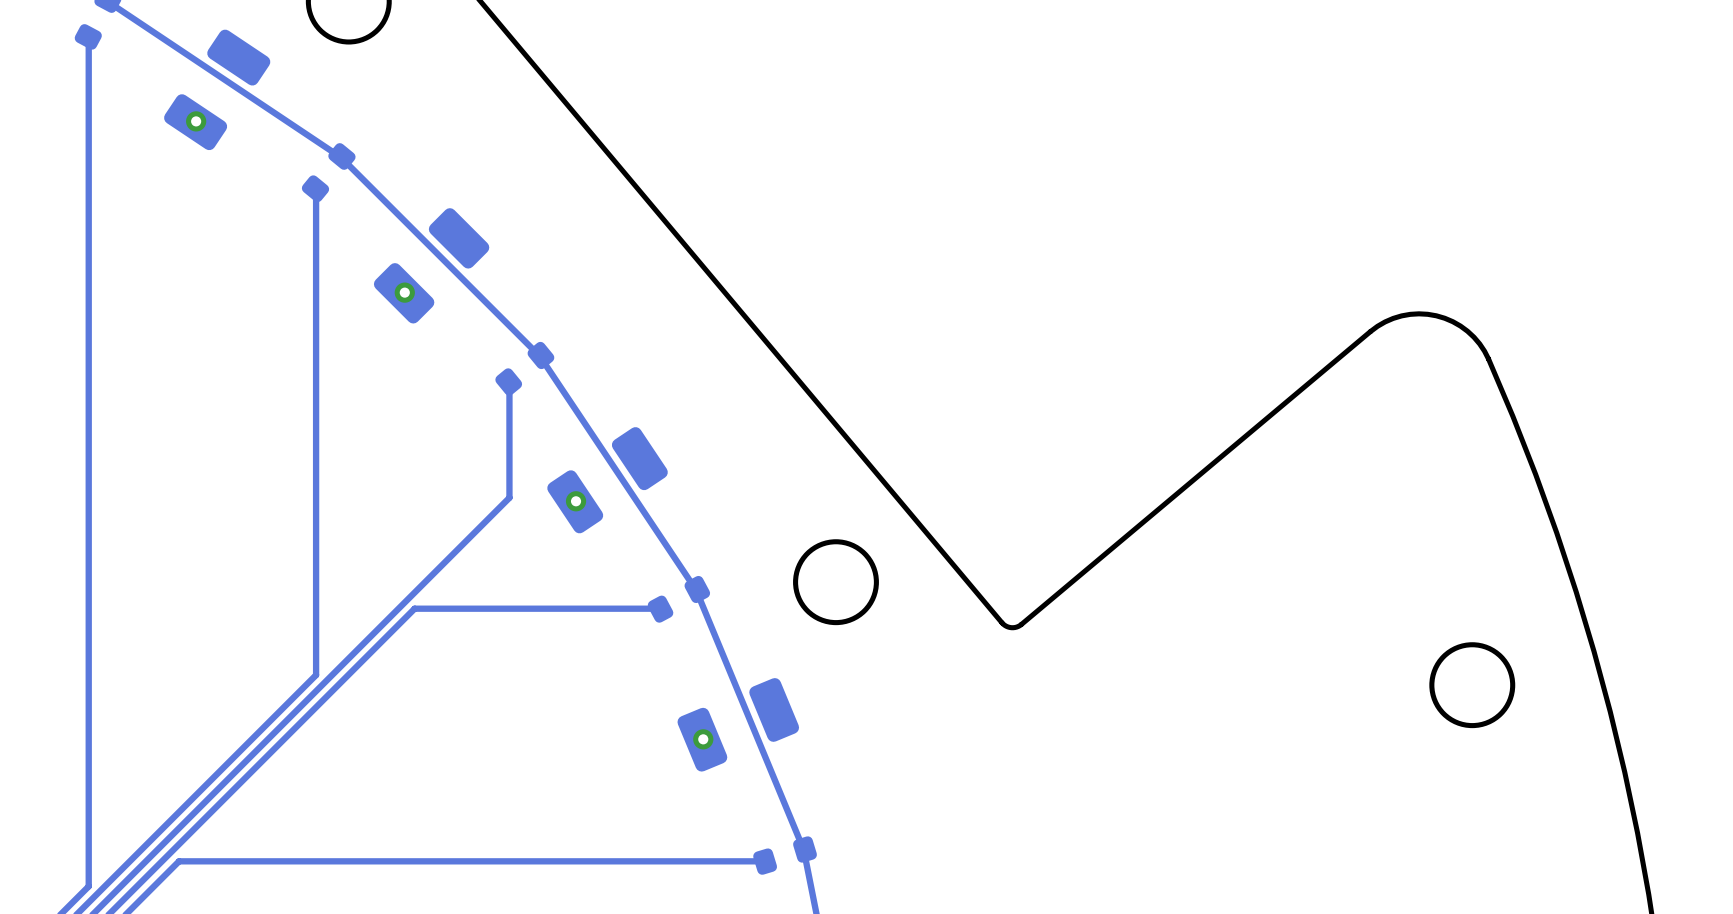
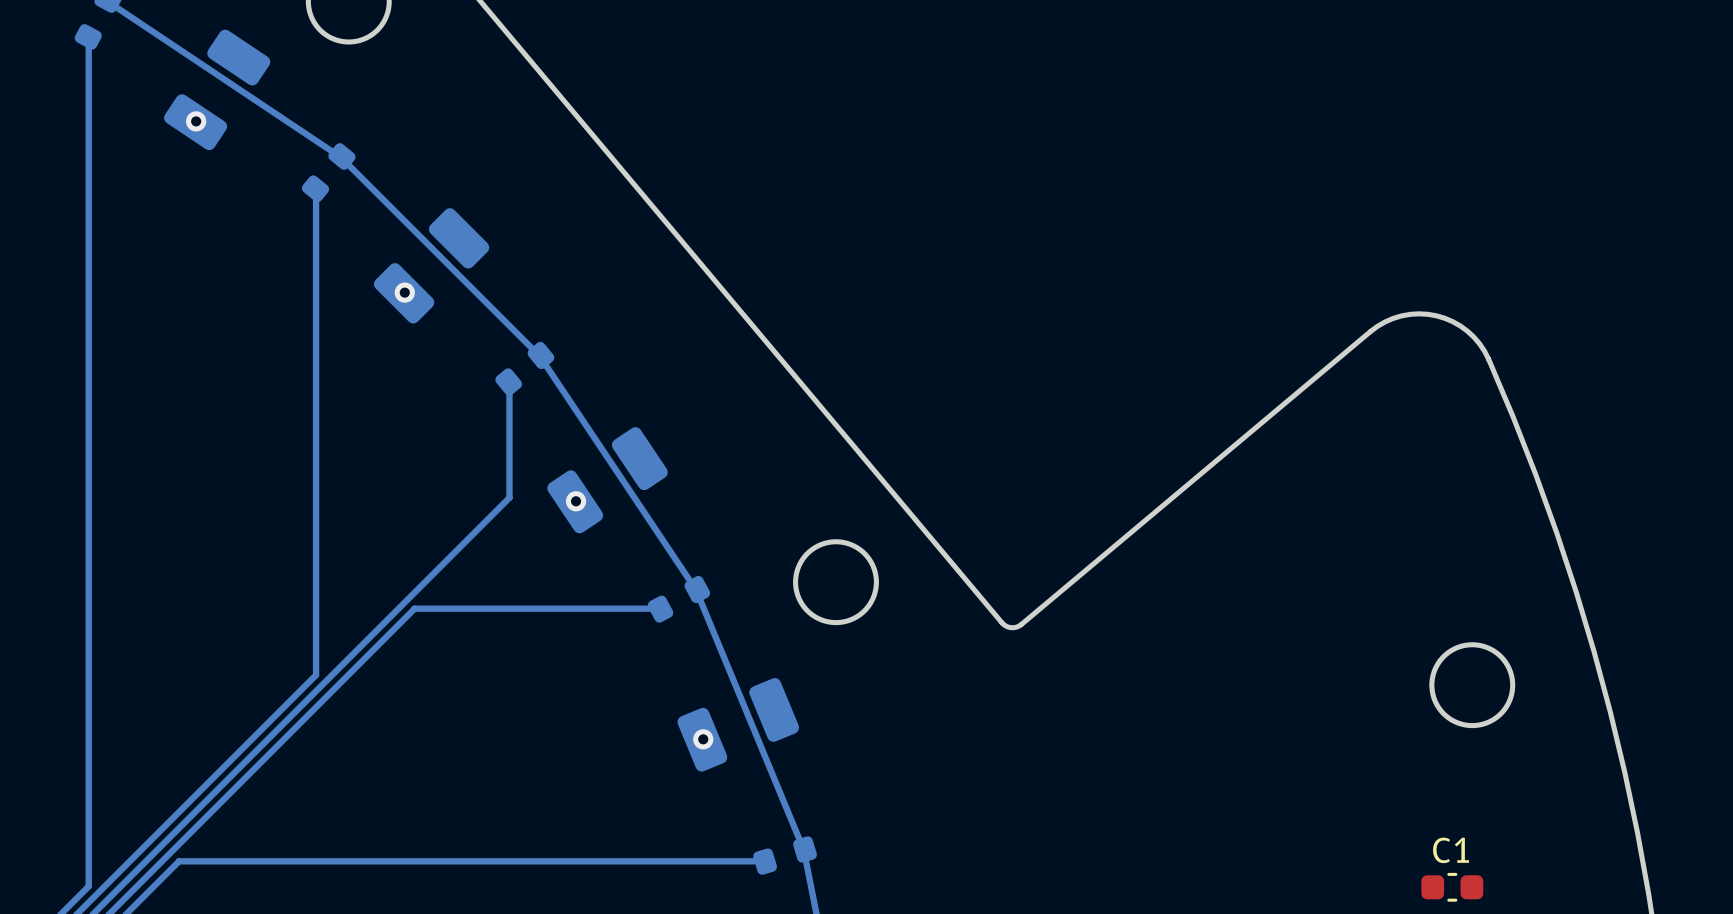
C1: none -> (1452, 887)

